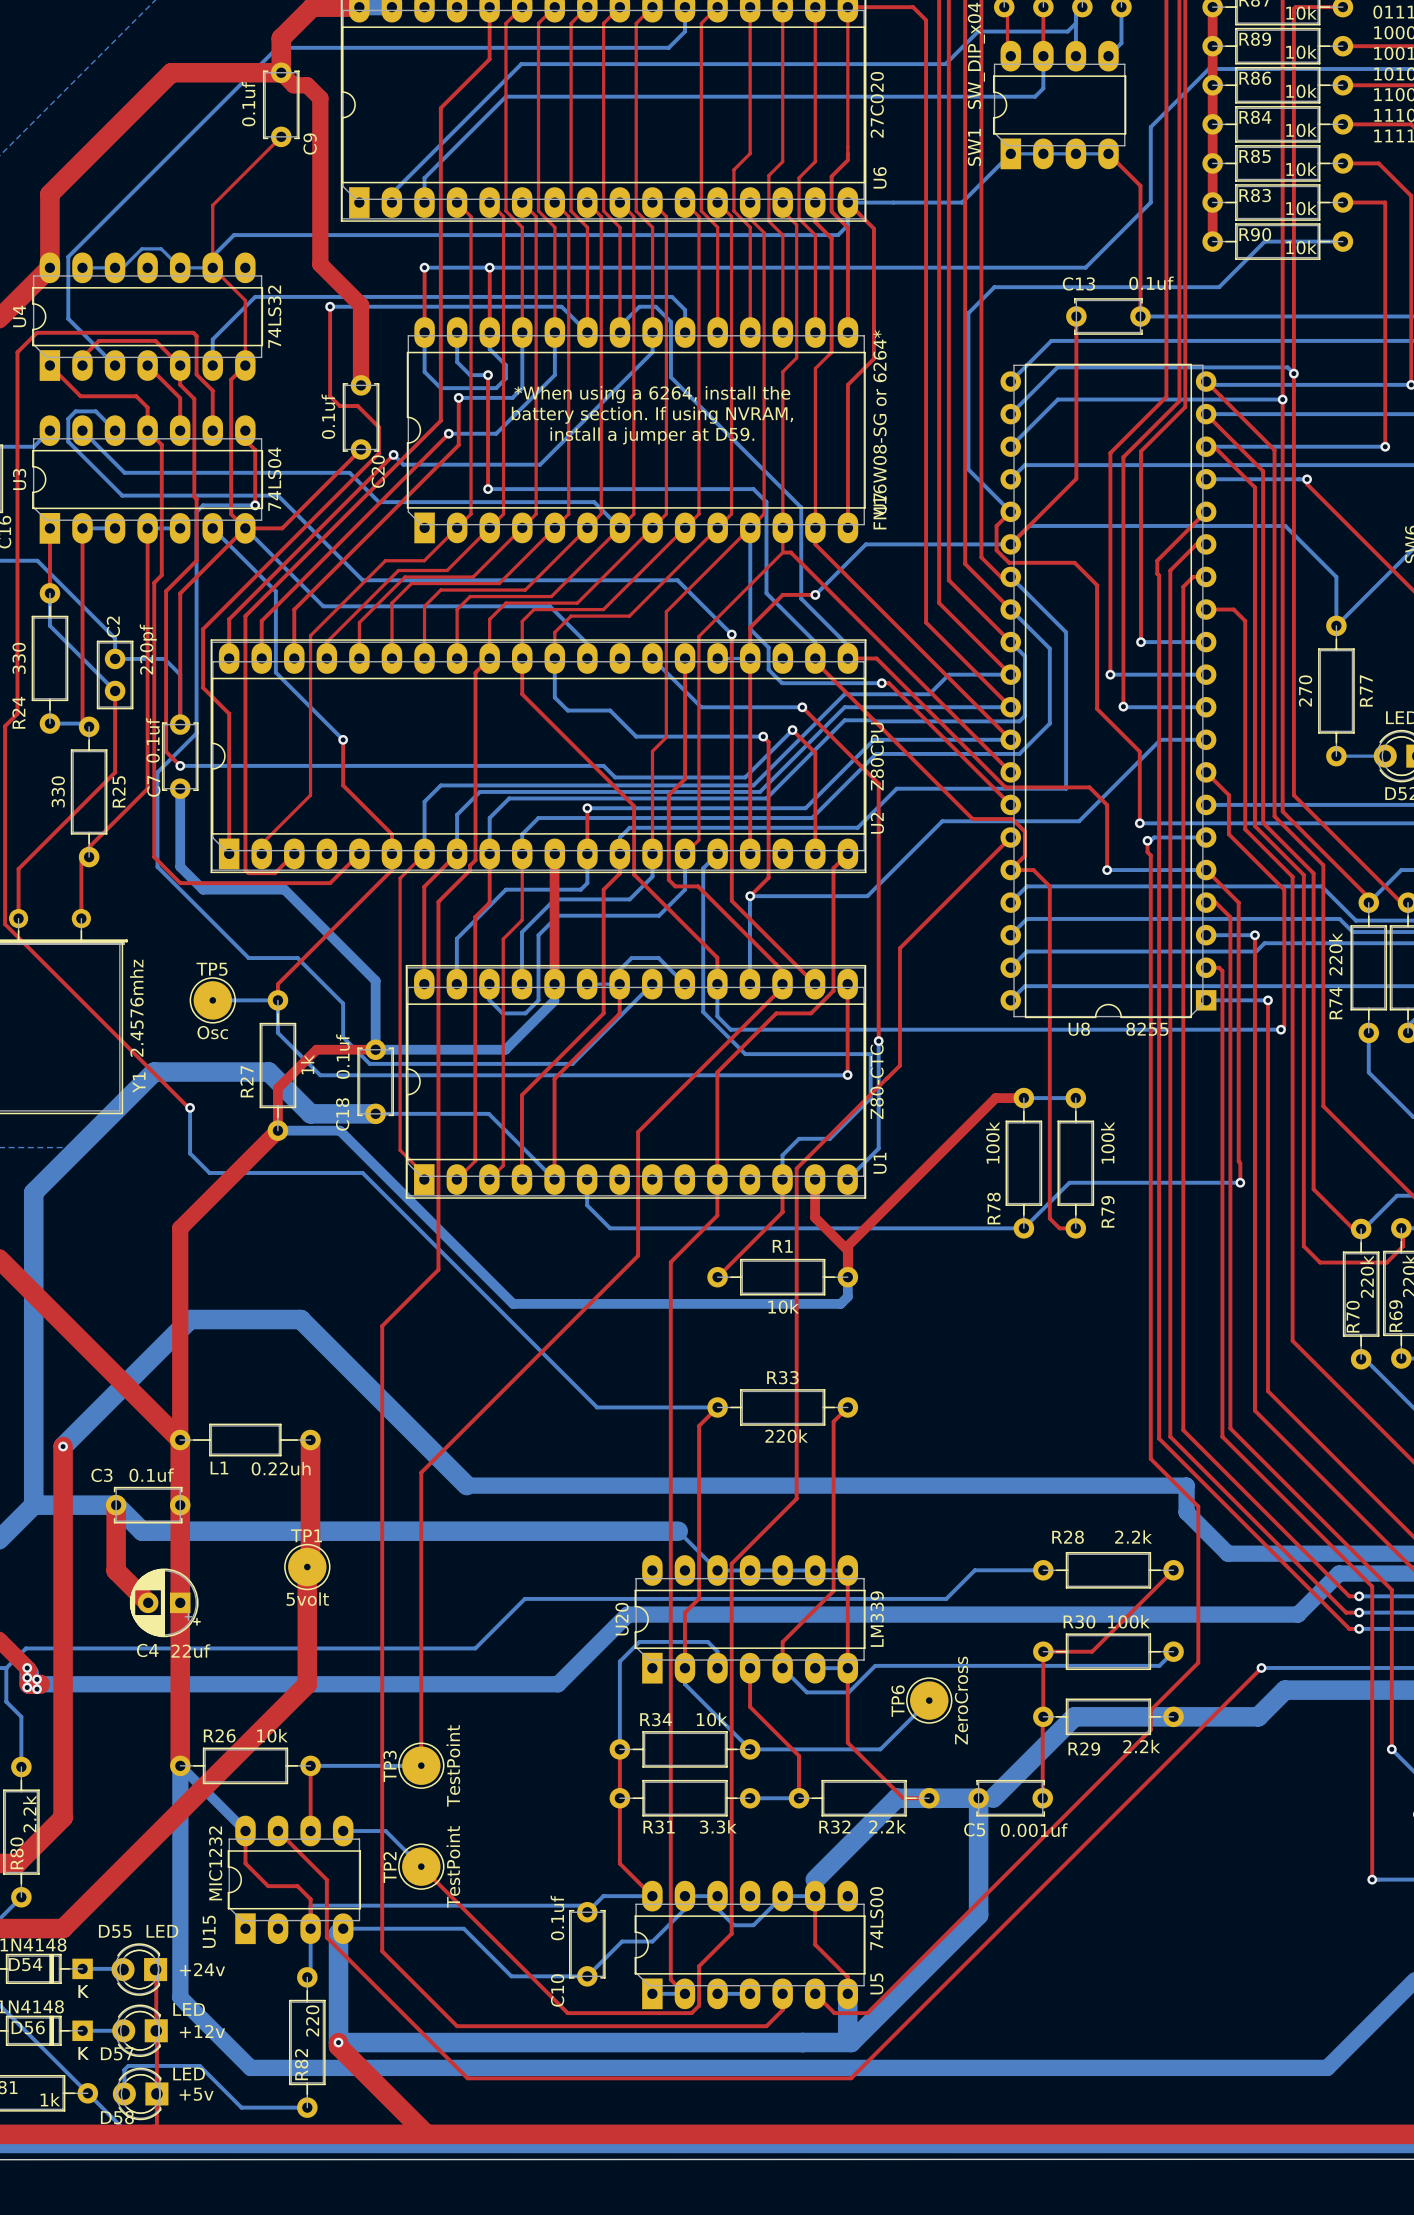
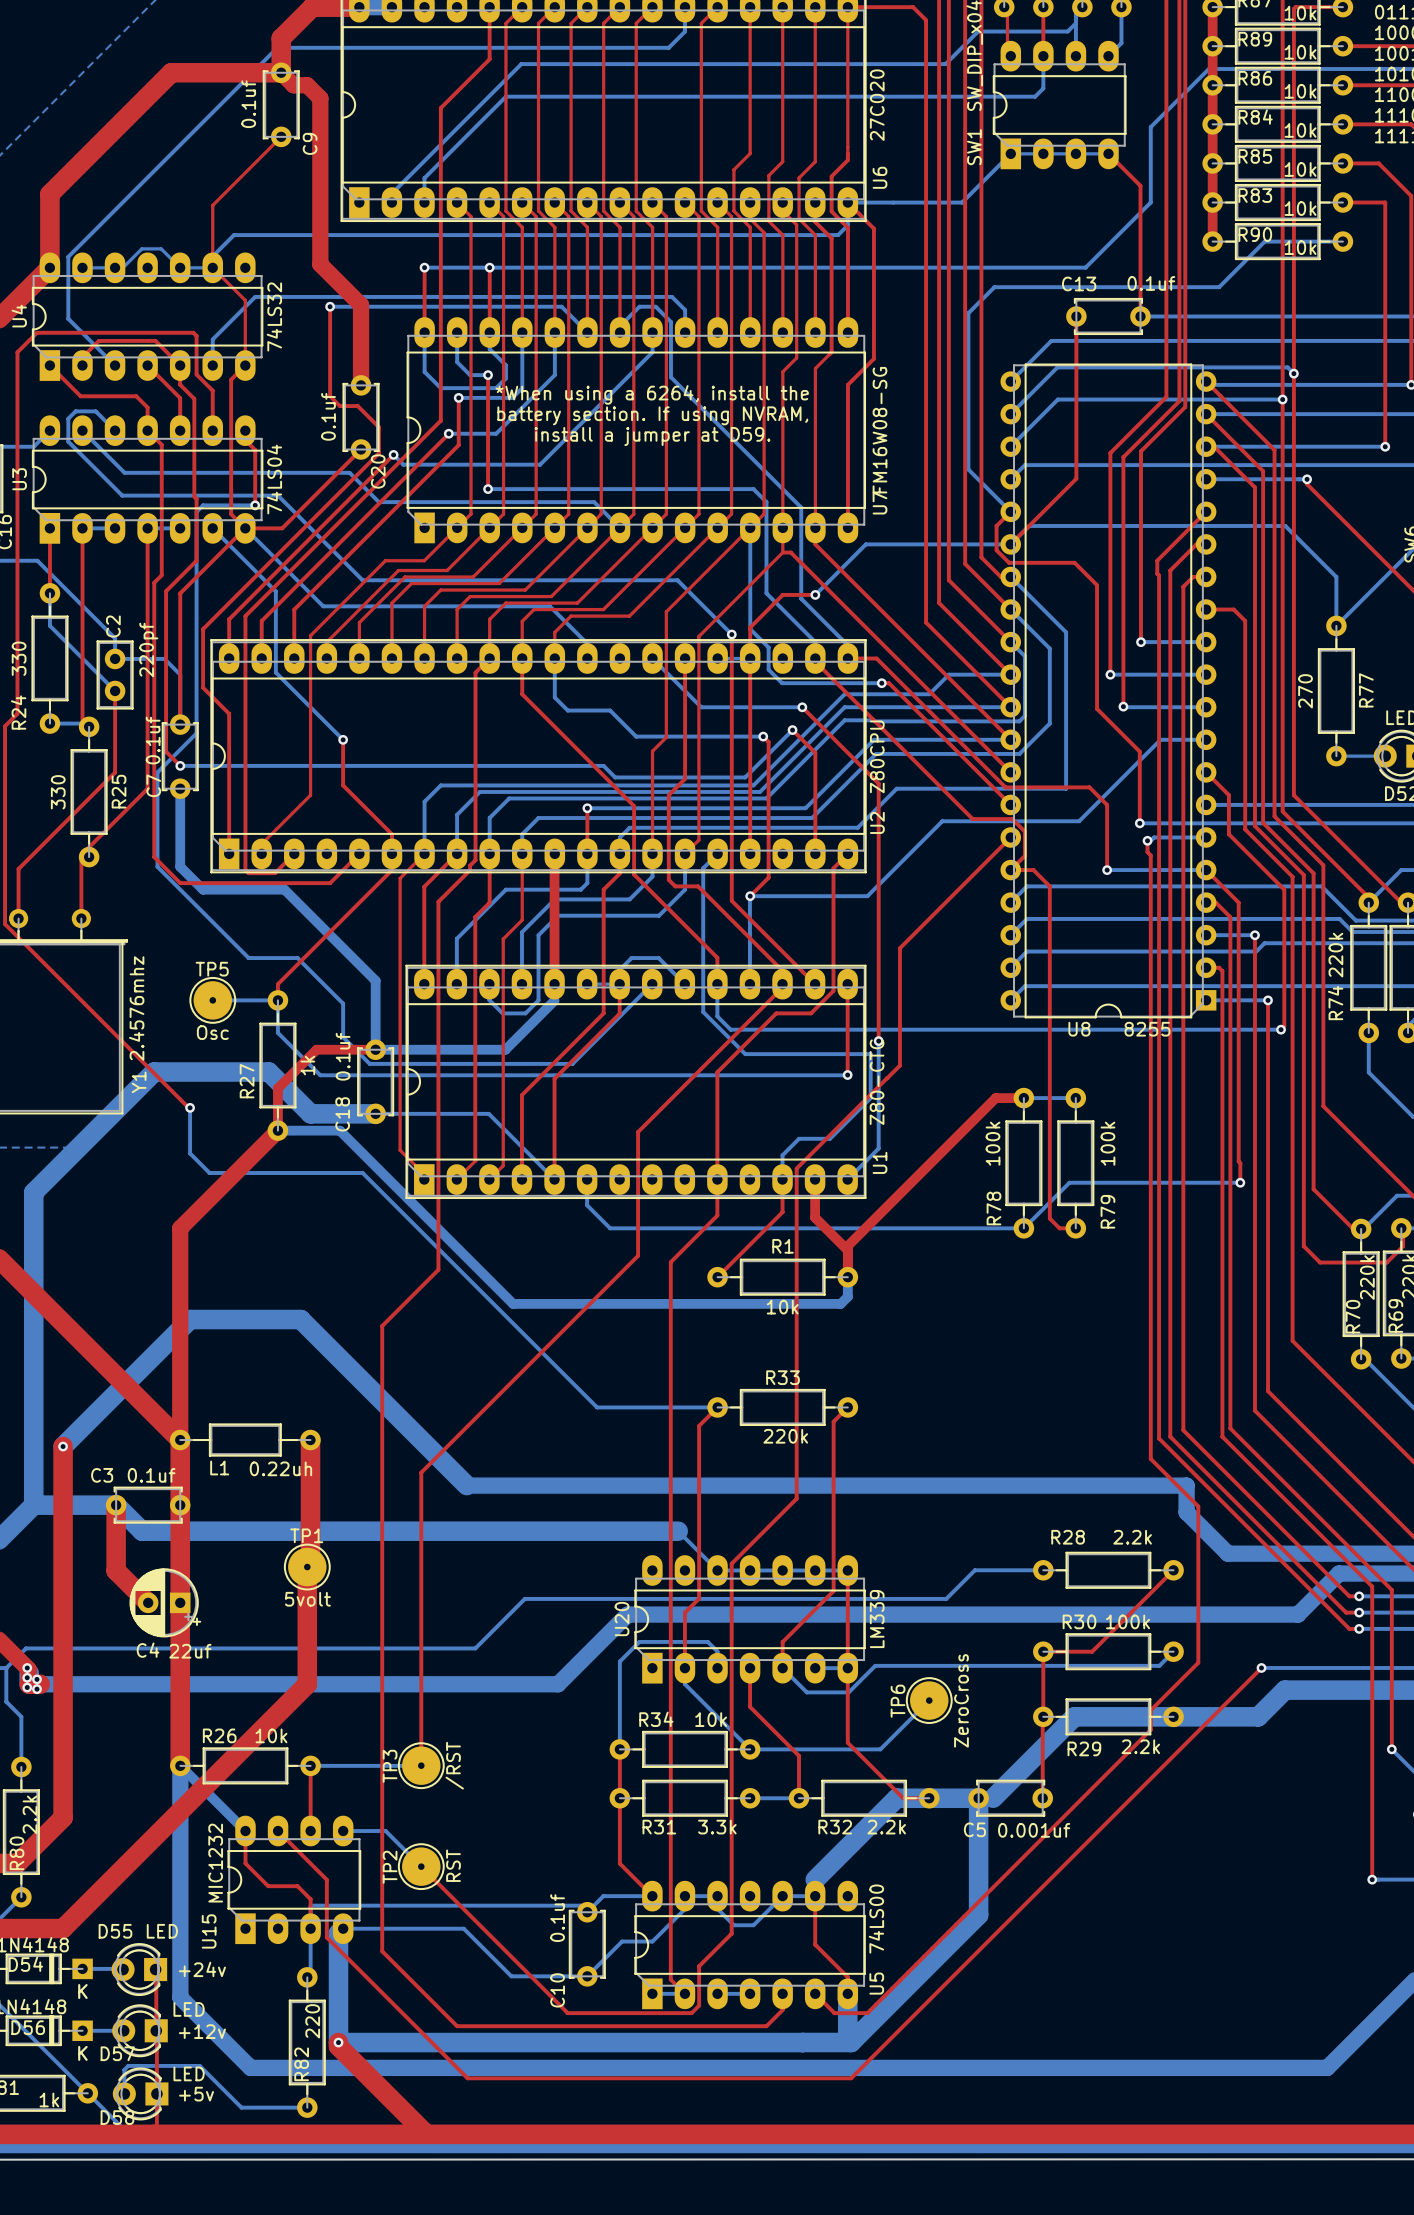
U7 value: FM16W08-SG or 6264* (880, 429) -> FM16W08-SG (879, 430)
TP3 value: TestPoint (453, 1765) -> /RST (454, 1765)
TP2 value: TestPoint (453, 1866) -> RST (453, 1865)

